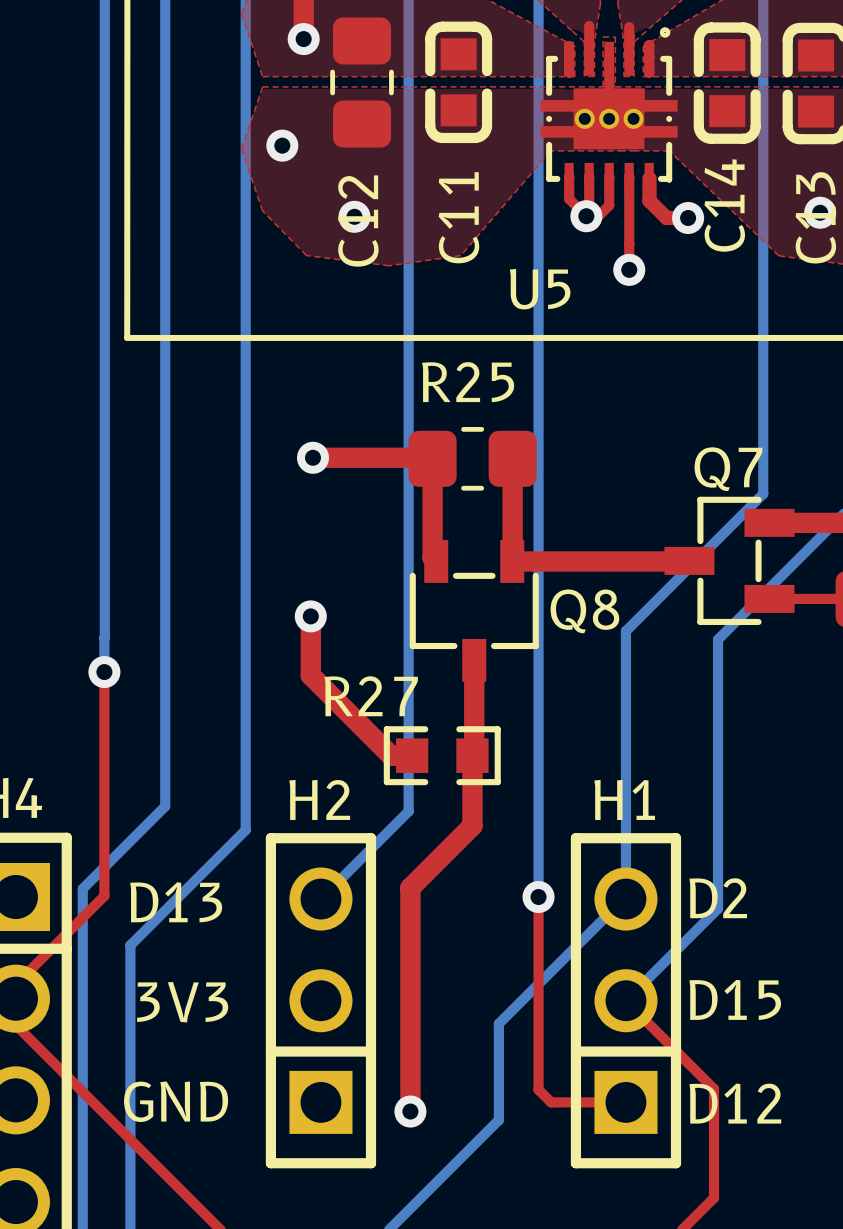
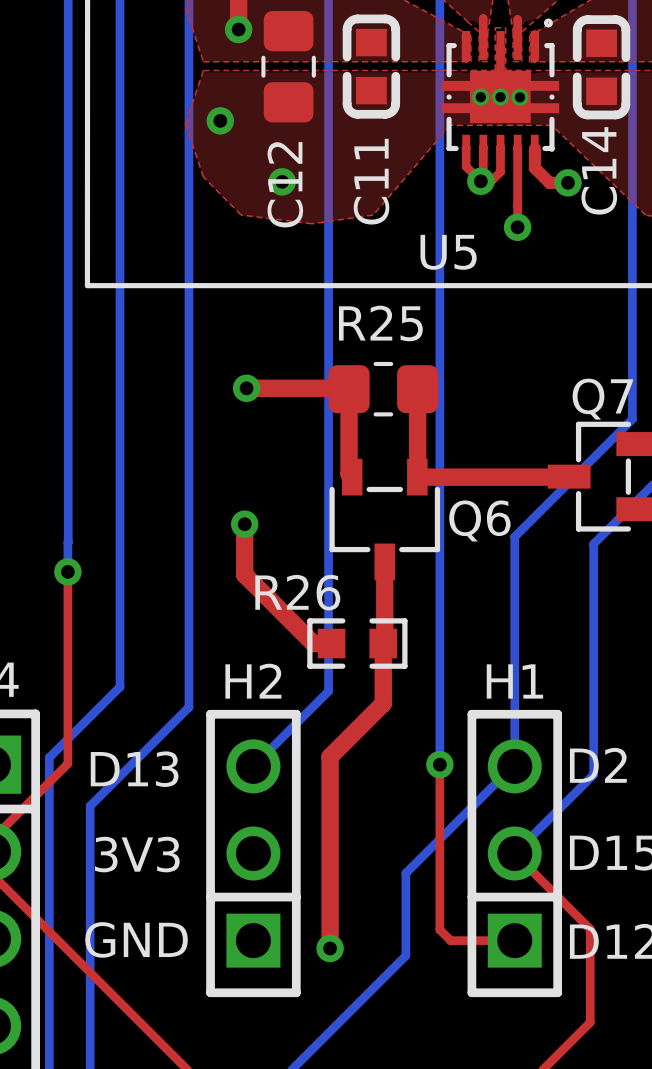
U5 footprint: [540, 27, 678, 195] -> [441, 18, 560, 163]
part: none -> (480, 97)
part: none -> (500, 97)
part: none -> (520, 97)
Q8 name: Q8 (584, 611) -> Q6 (479, 520)
R27 name: R27 (371, 696) -> R26 (297, 592)

